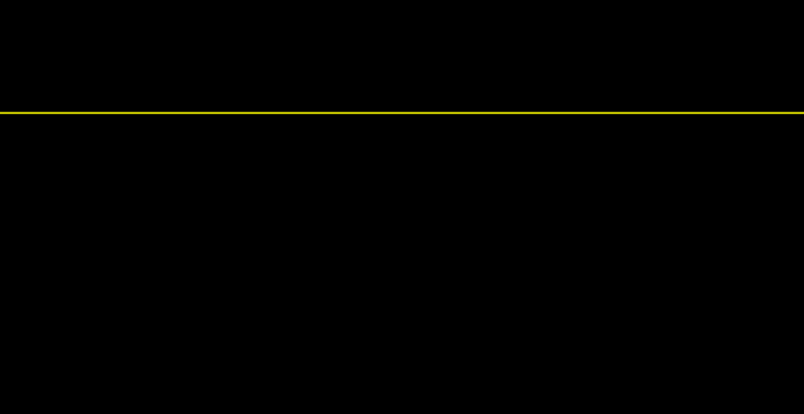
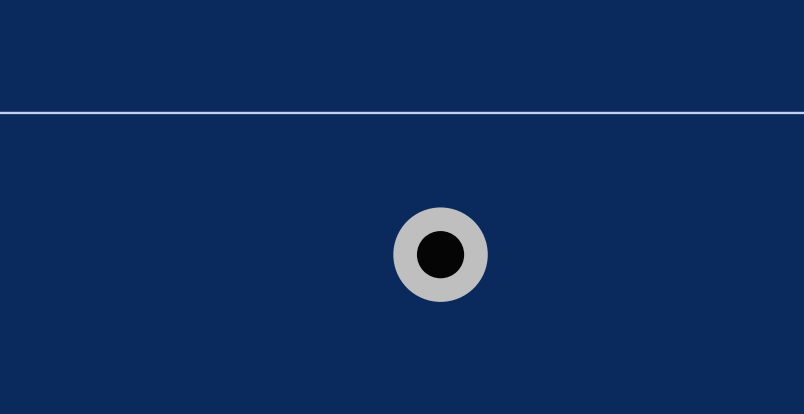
via: none -> (440, 254)

